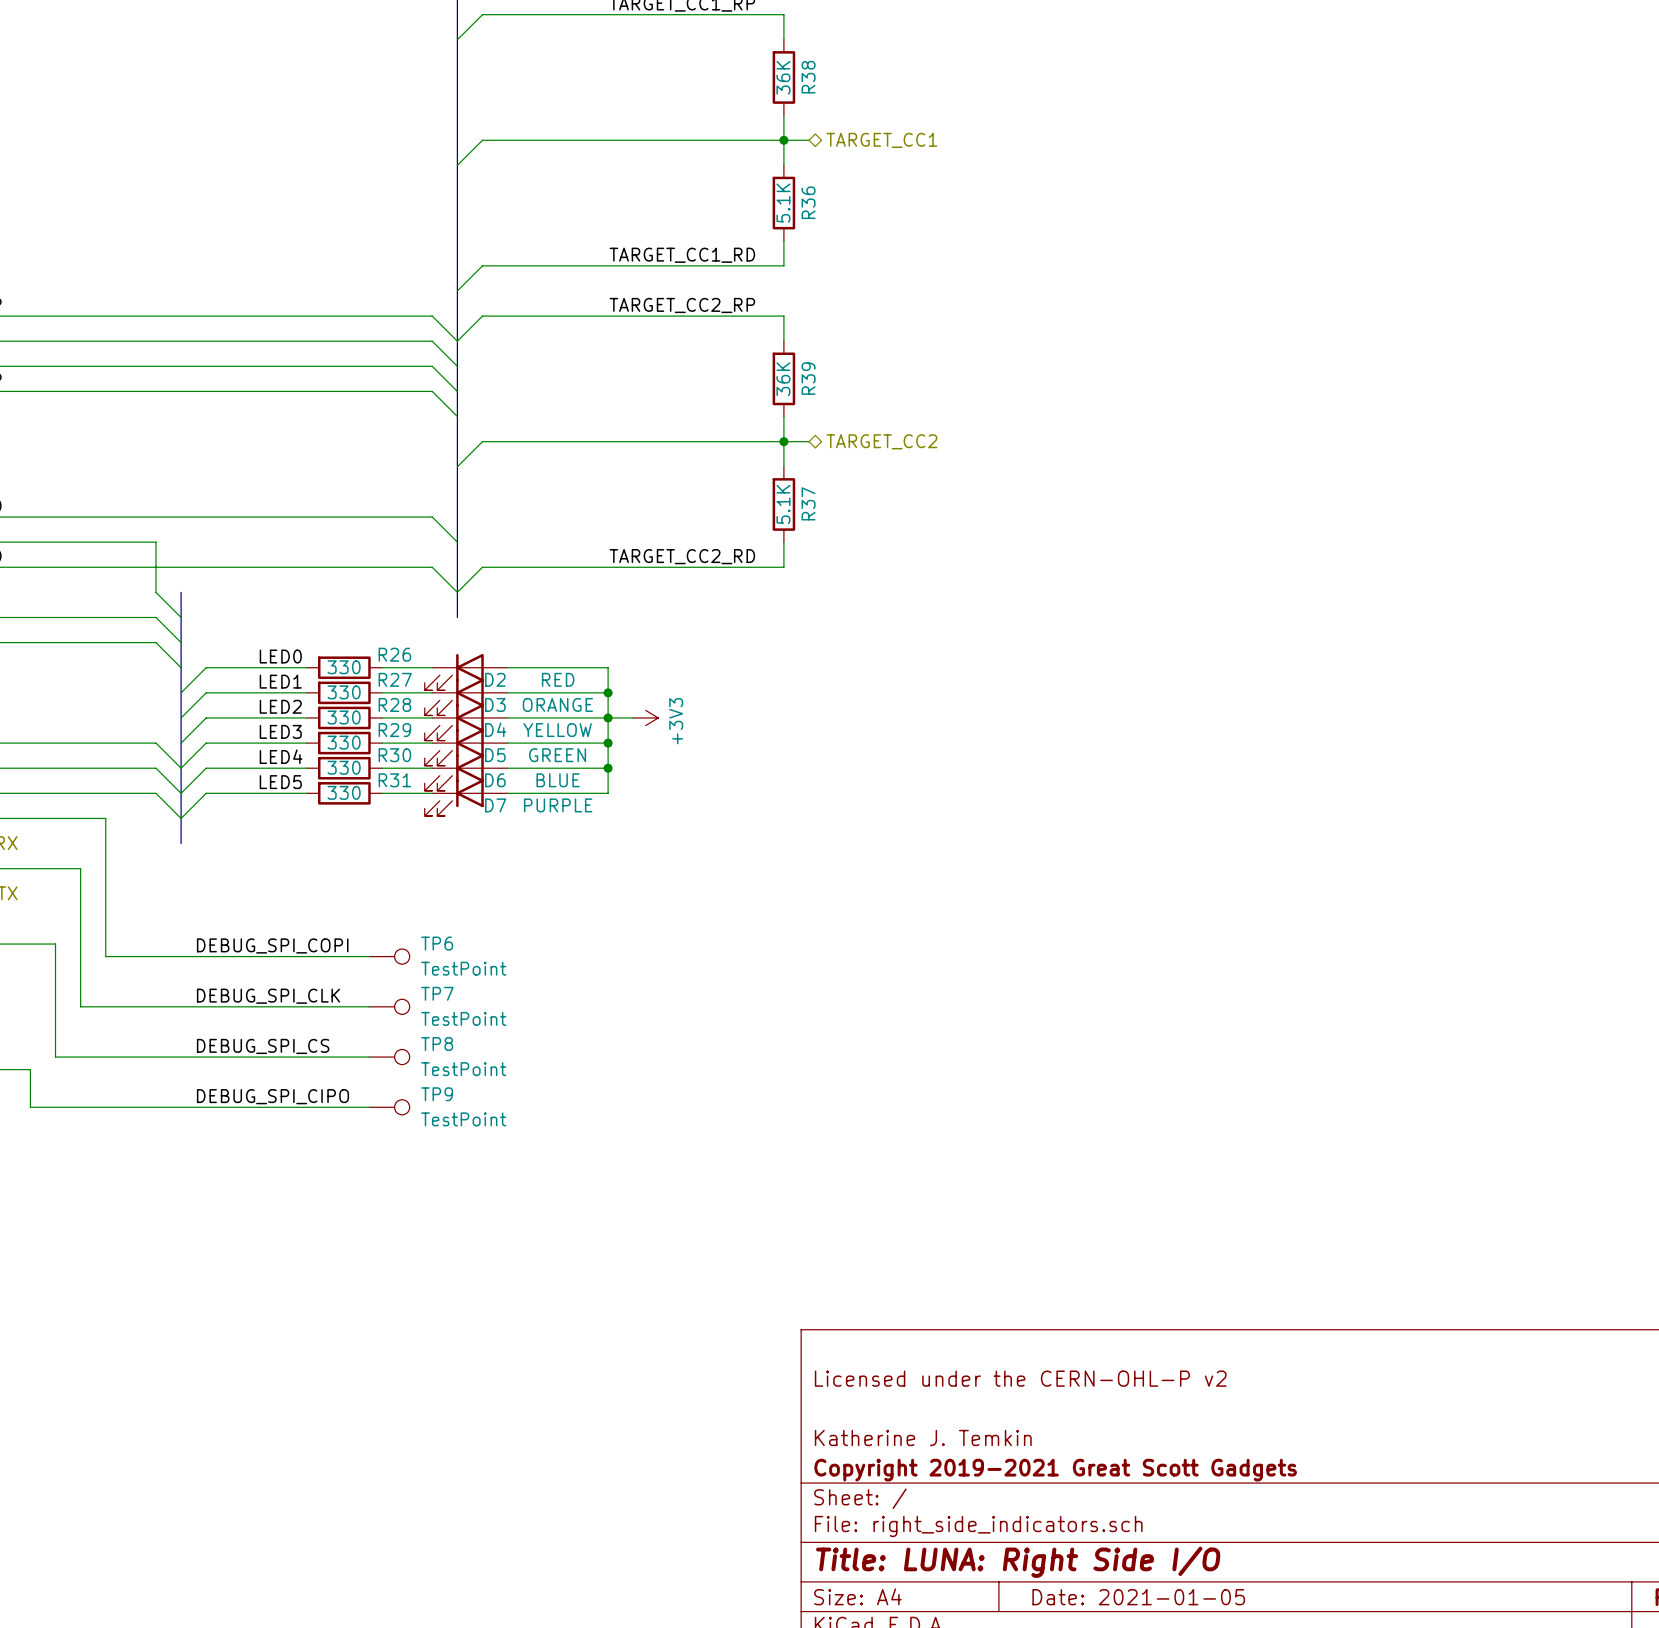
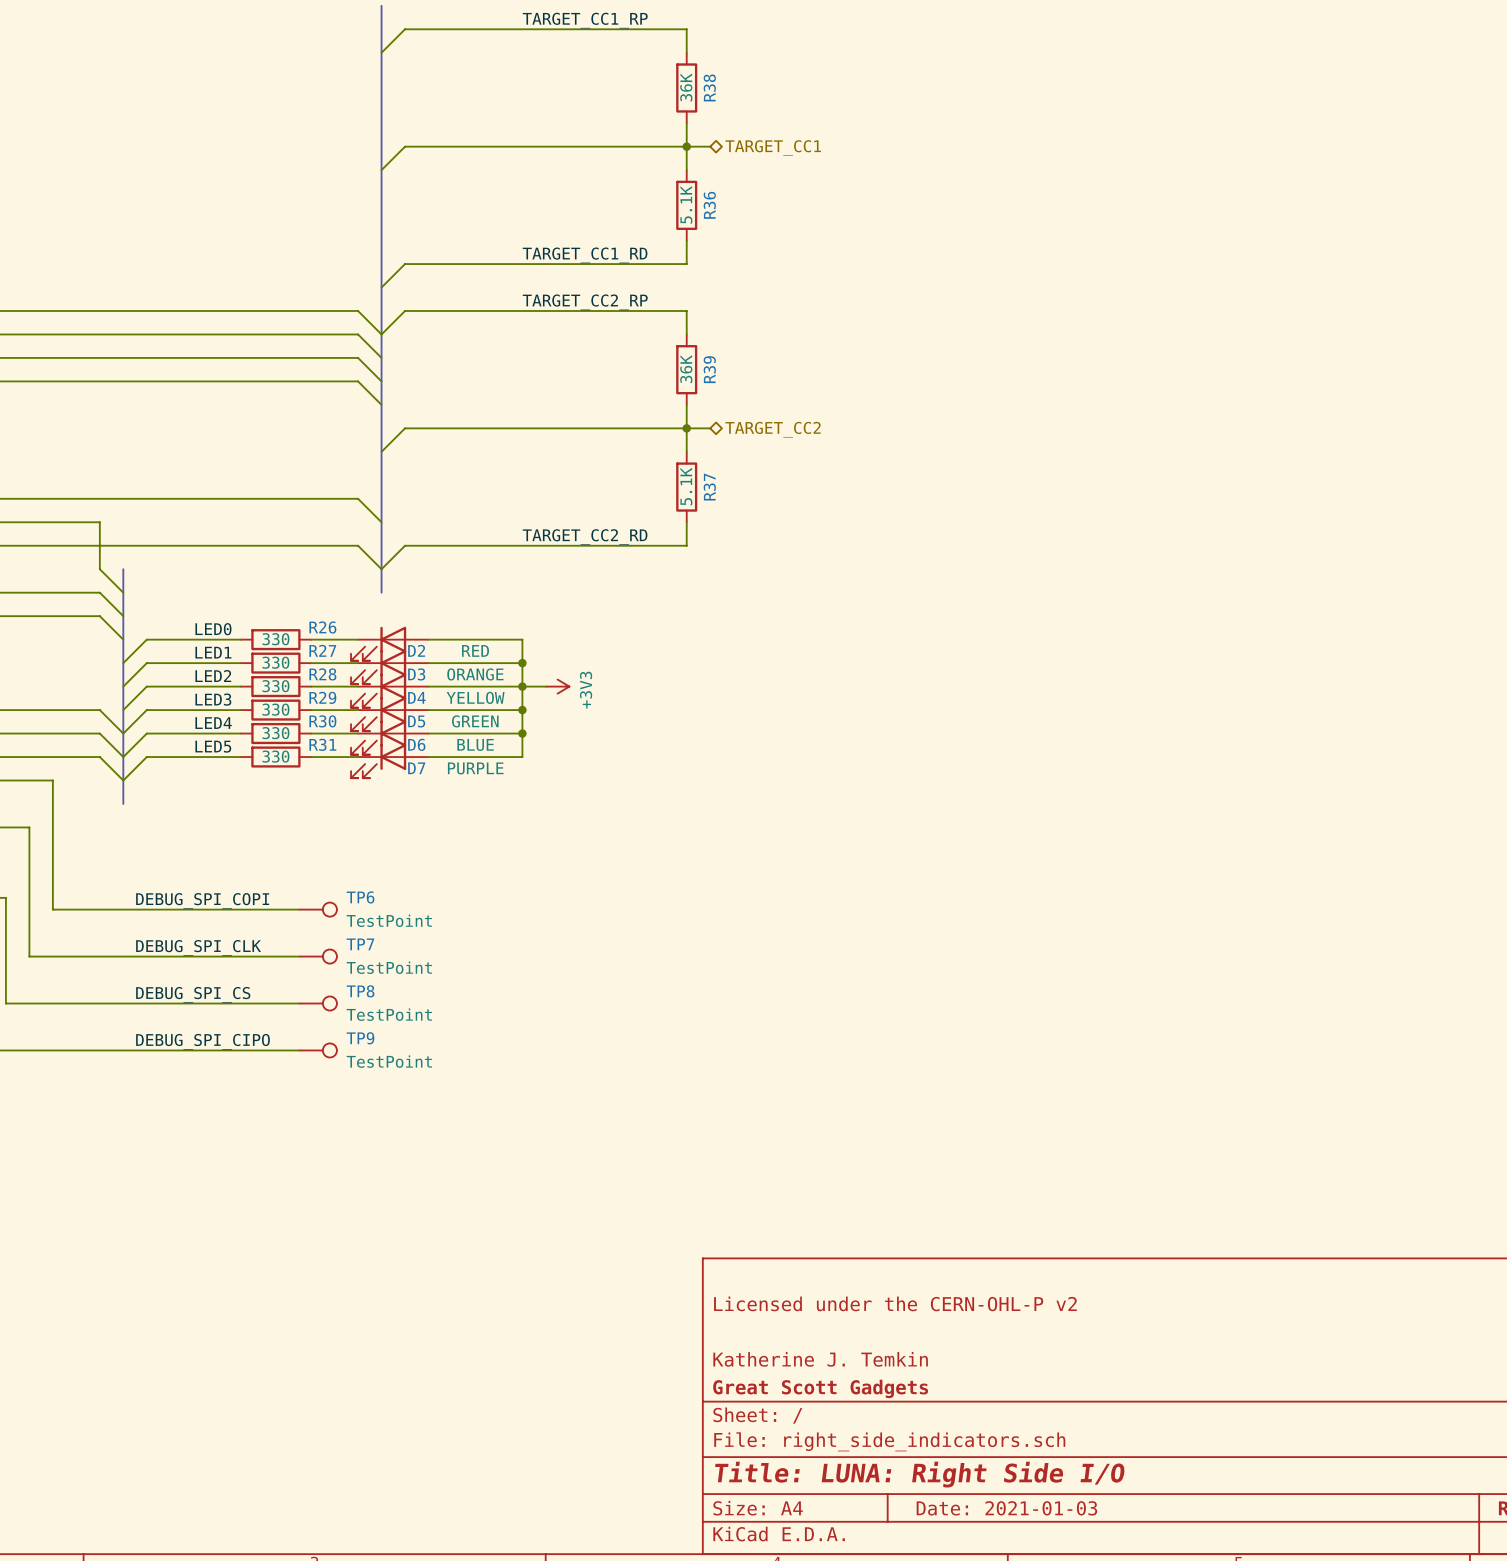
title block: Copyright 2019-2021 Great Scott Gadgets (1055, 1470) -> Great Scott Gadgets (820, 1388)
title block: Date: 2021-01-05 (1138, 1597) -> Date: 2021-01-03 (1006, 1508)

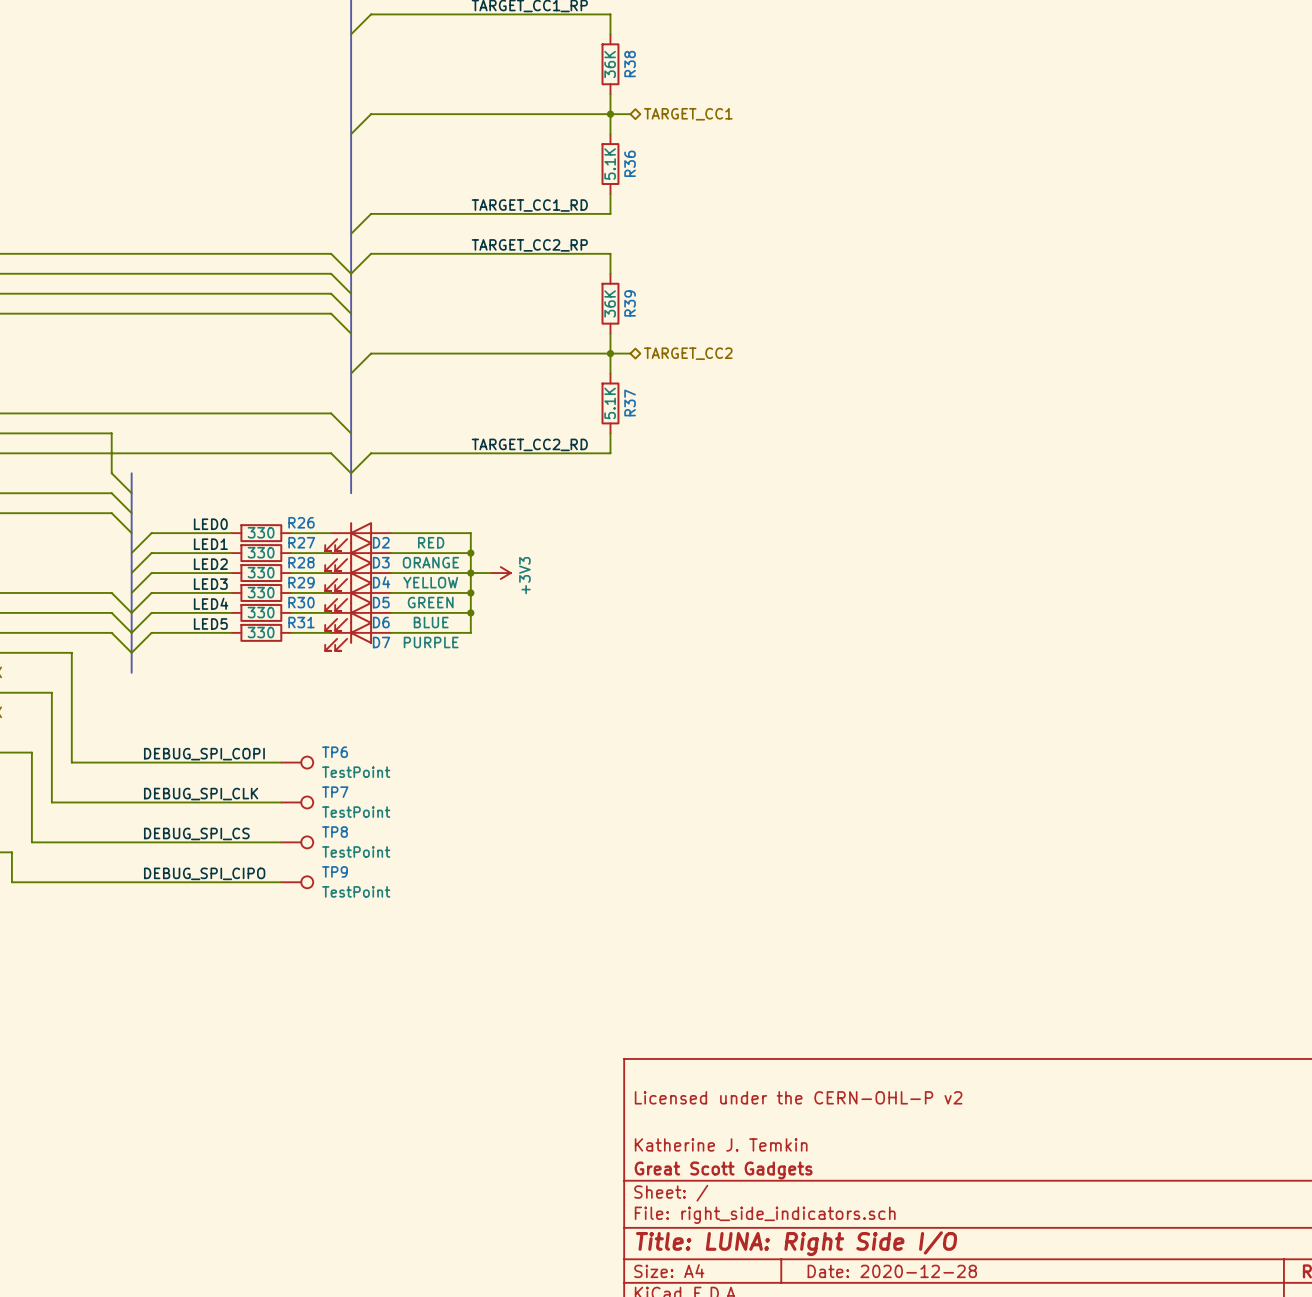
title block: Date: 2021-01-03 (1006, 1508) -> Date: 2020-12-28 (892, 1271)

